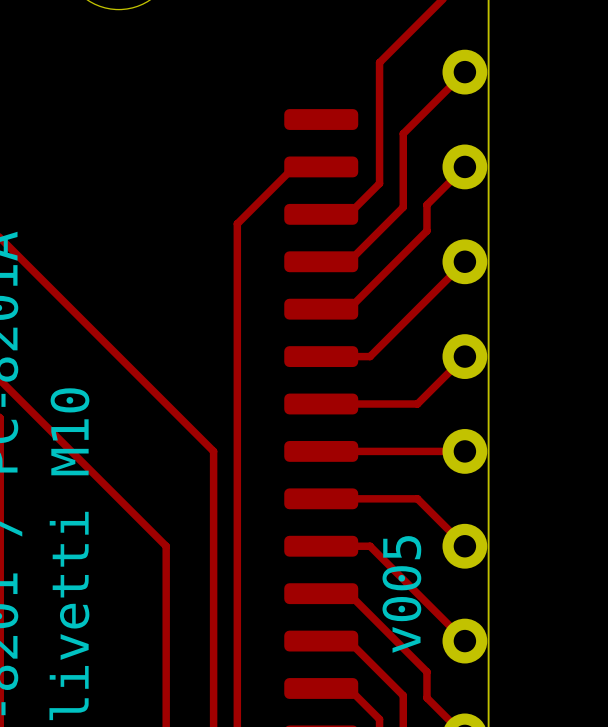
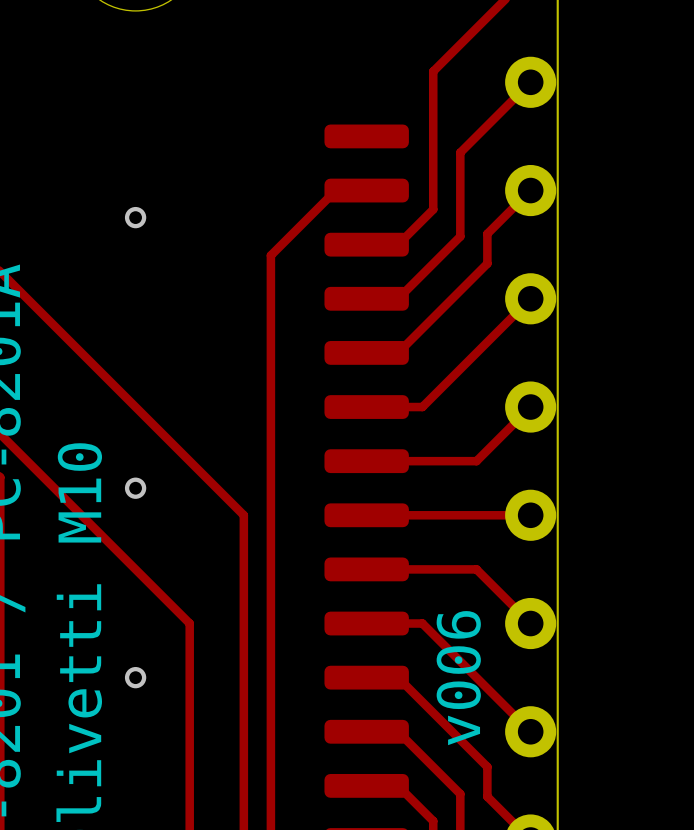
via: none -> (135, 217)
via: none -> (135, 488)
via: none -> (135, 677)
text: v005 (401, 594) -> v006 (458, 678)

